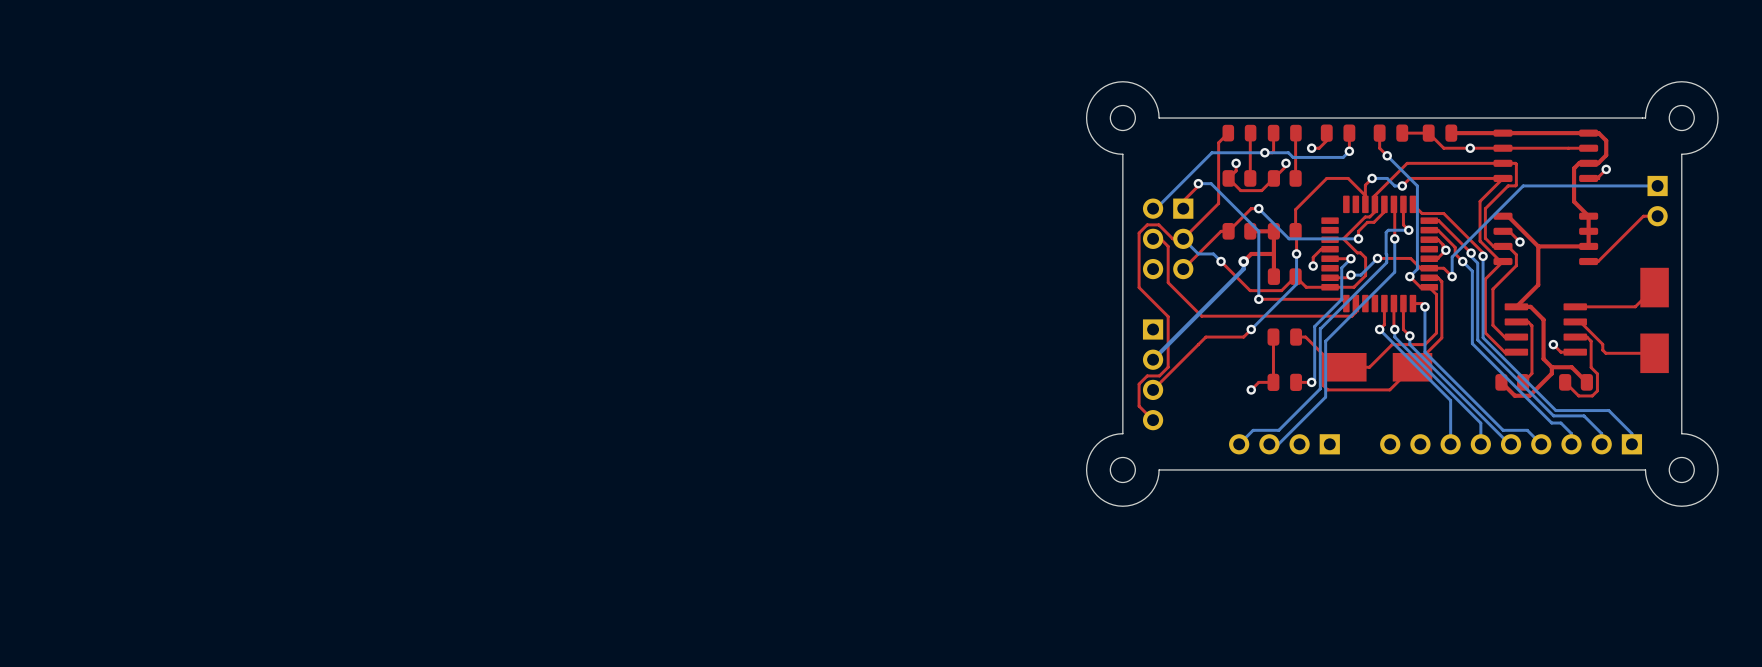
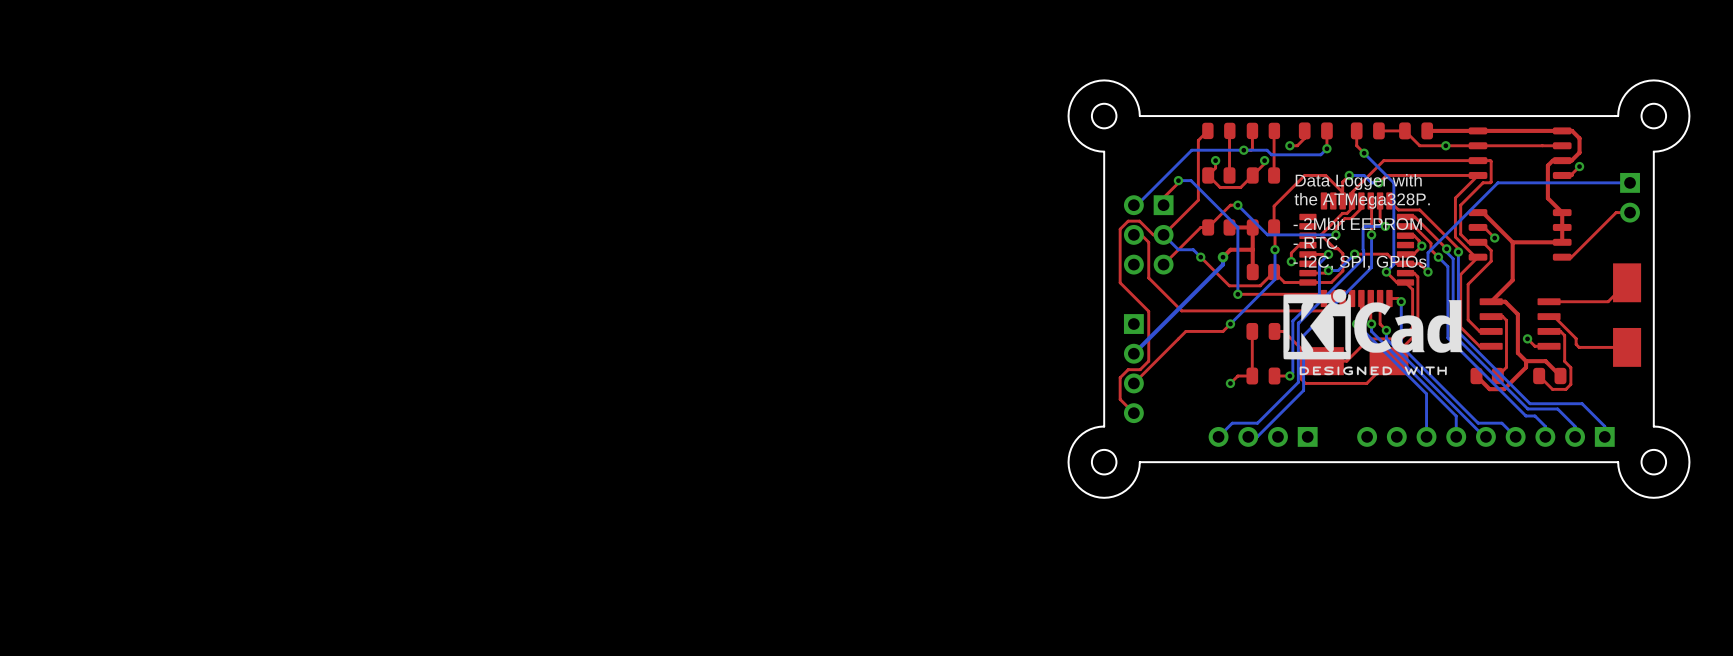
text: none -> Data Logger with (1358, 182)
text: none -> the ATMega328P. (1362, 200)
text: none -> - 2Mbit EEPROM (1357, 223)
text: none -> - RTC (1315, 242)
text: none -> - I2C, SPI, GPIOs (1359, 262)
drawing: none -> [1283, 289, 1463, 376]

